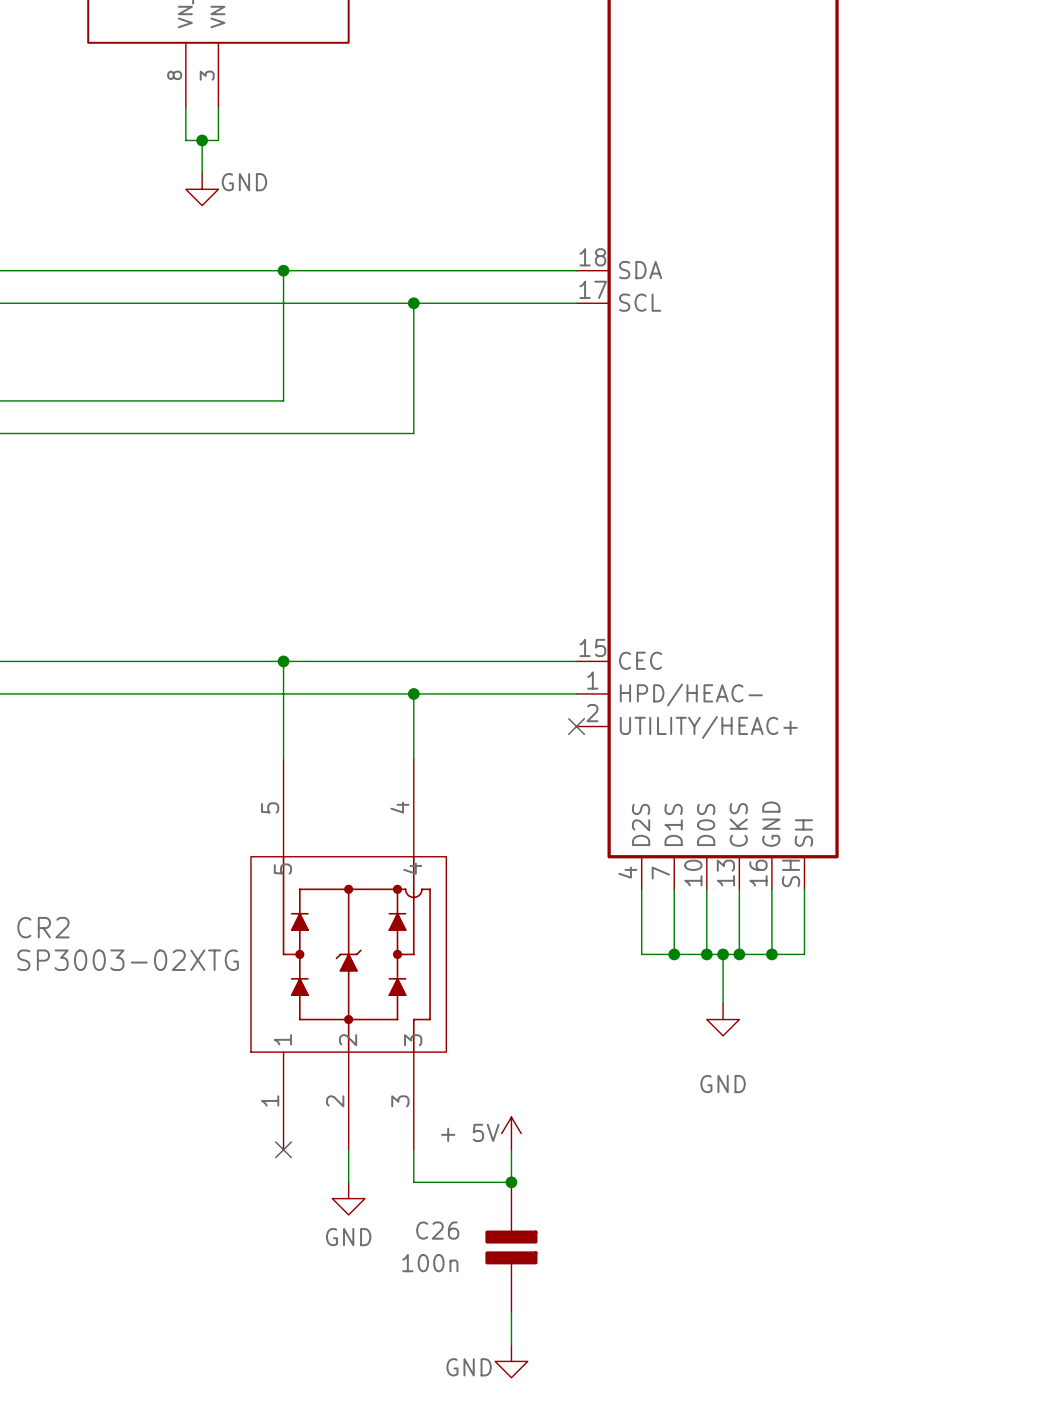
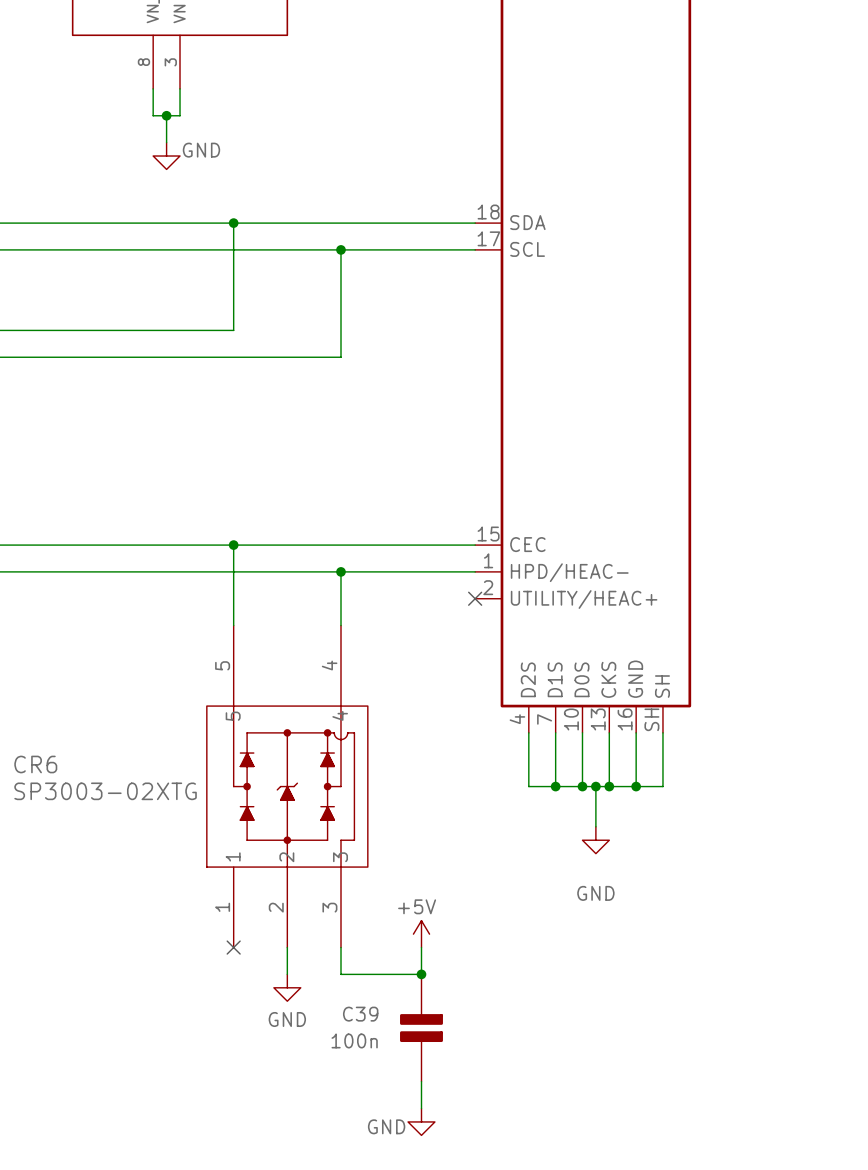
CR2 name: CR2 (43, 927) -> CR6 (35, 764)
power symbol: + 5V (511, 1133) -> +5V (421, 934)
C26 name: C26 (437, 1230) -> C39 (360, 1014)

